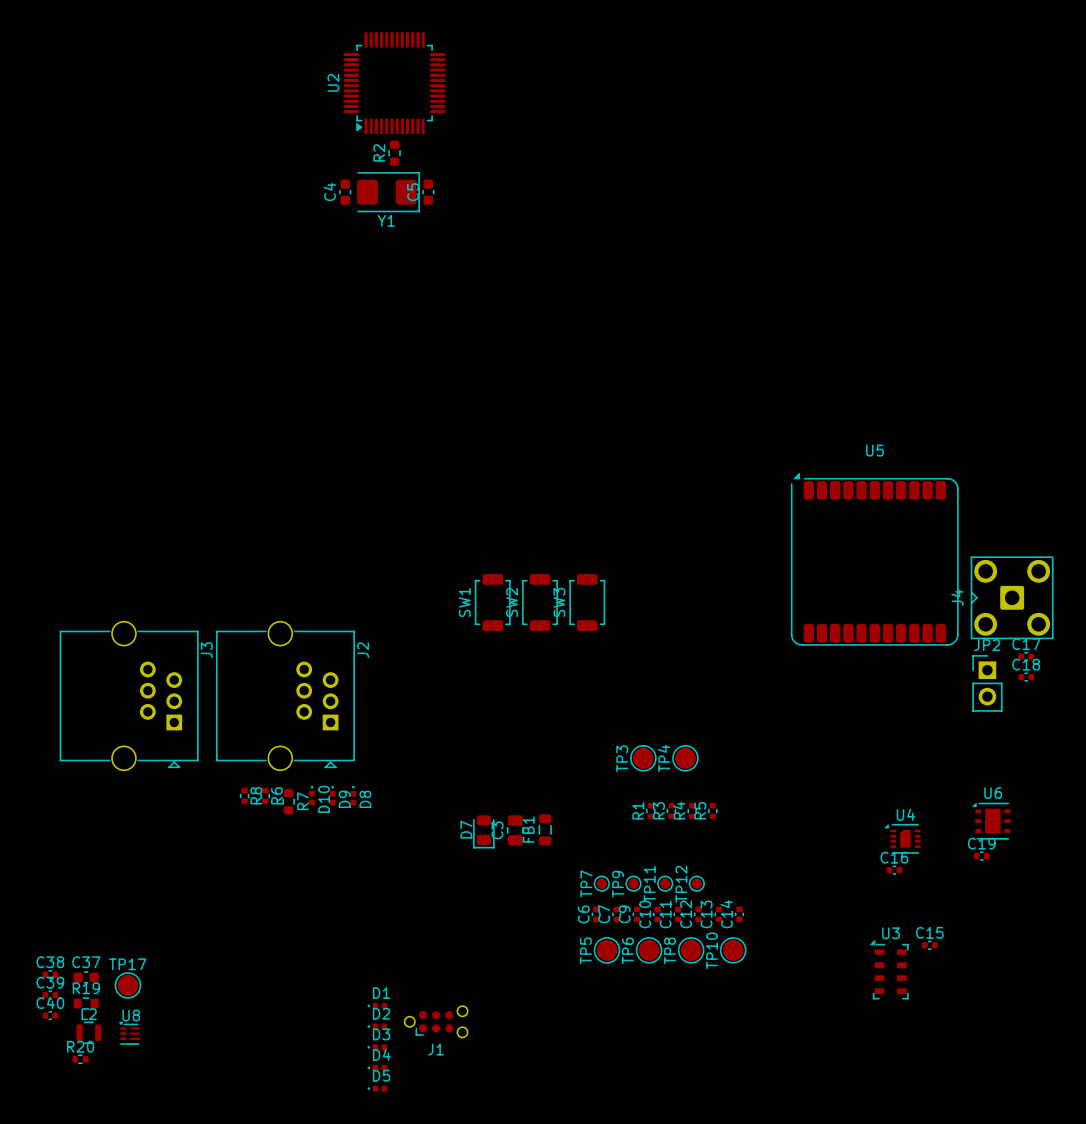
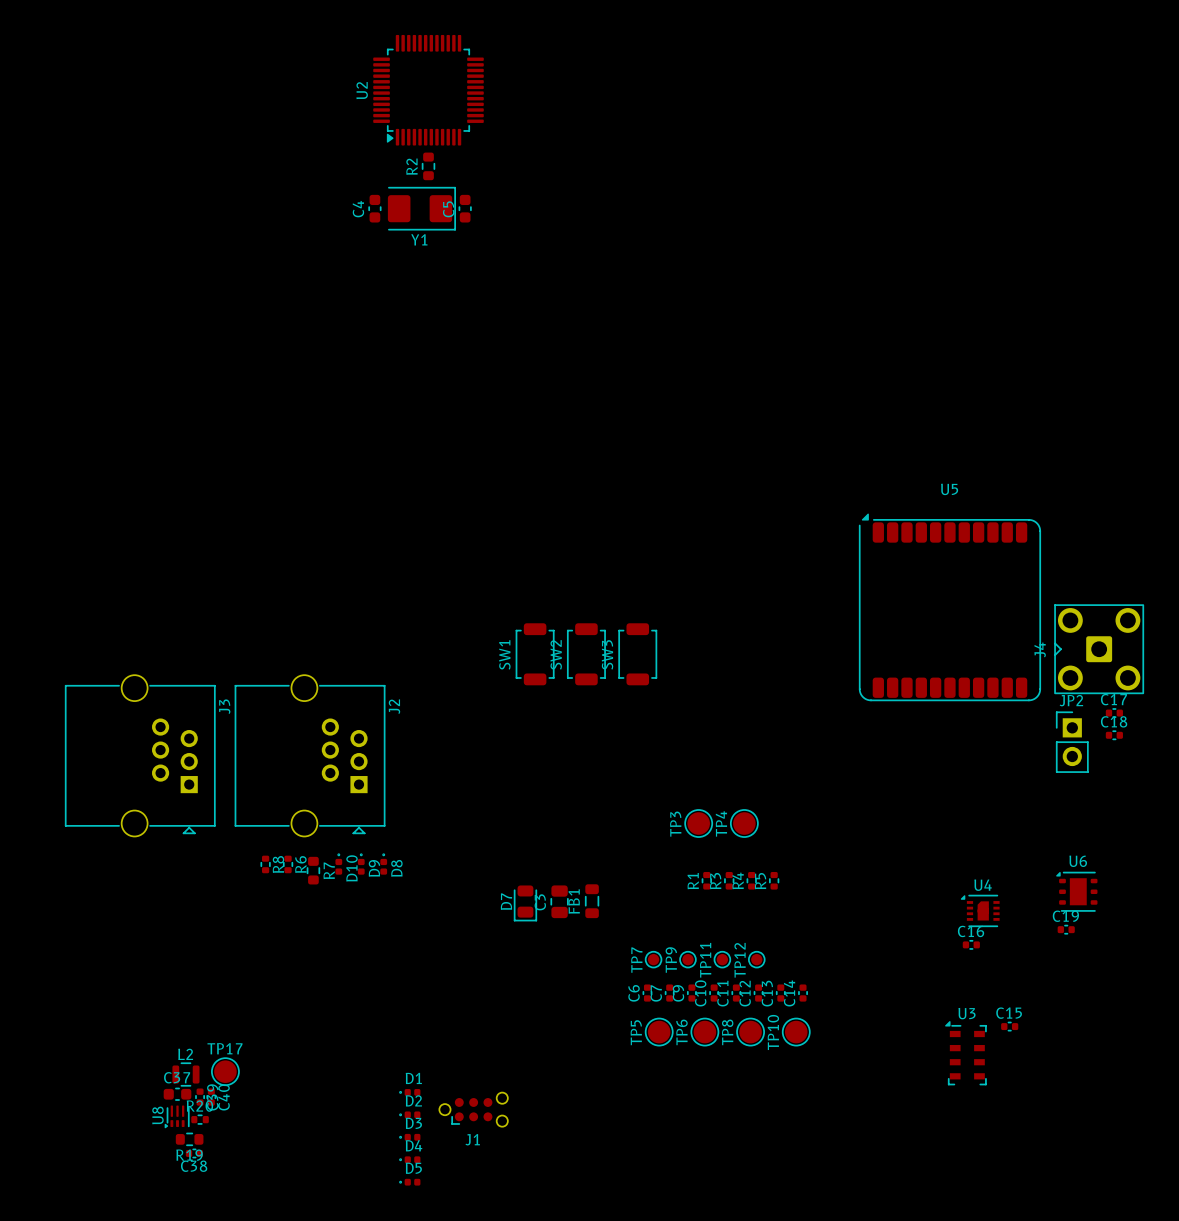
C38 name position: C38 (50, 962) -> C38 (194, 1166)
C38 position: (50, 974) -> (194, 1153)
C37 position: (86, 977) -> (177, 1094)
TP17 position: (127, 985) -> (225, 1071)
R19 name position: R19 (86, 988) -> R19 (189, 1155)
C39 rotation: 0° (50, 995) -> 90° clockwise (200, 1097)
C39 position: (50, 995) -> (200, 1097)
R19 position: (86, 1003) -> (189, 1139)
C40 rotation: 0° (50, 1015) -> 90° clockwise (211, 1097)
C40 position: (50, 1015) -> (211, 1097)
L2 position: (88, 1032) -> (185, 1074)
U8 rotation: 0° (129, 1033) -> 90° counterclockwise (177, 1116)
U8 position: (129, 1033) -> (177, 1116)
R20 position: (80, 1059) -> (200, 1119)

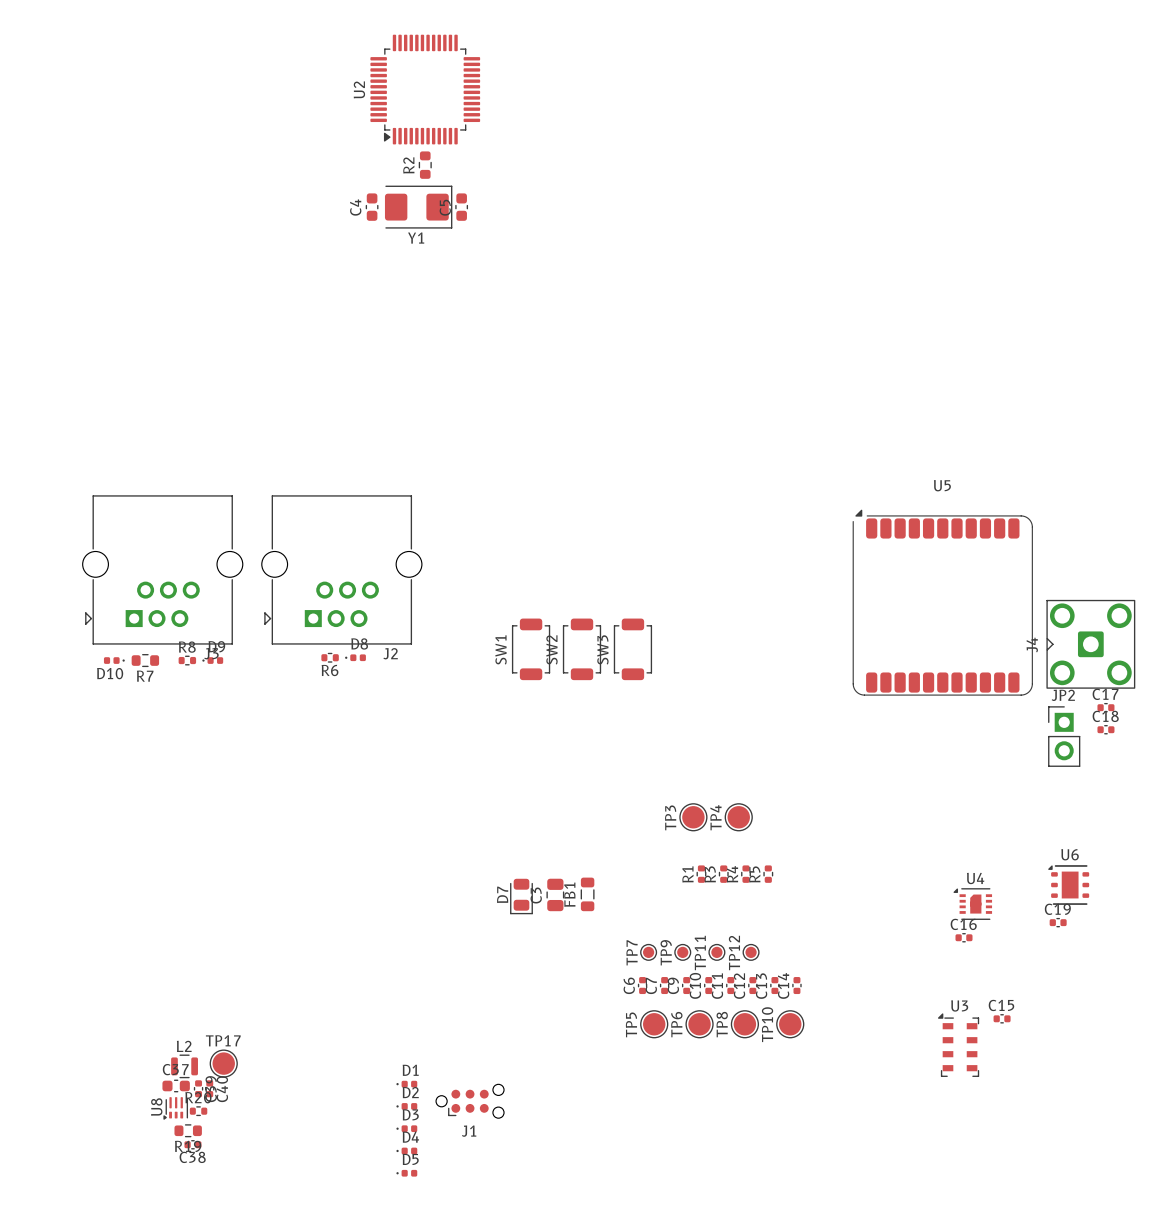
J3 rotation: 0° (140, 755) -> 90° clockwise (162, 569)
J3 position: (140, 755) -> (162, 569)
J2 rotation: 0° (310, 755) -> 90° clockwise (341, 569)
J2 position: (310, 755) -> (341, 569)
R8 rotation: 0° (265, 864) -> 90° clockwise (187, 660)
R8 position: (265, 864) -> (187, 660)
R6 rotation: 0° (288, 864) -> 90° clockwise (330, 657)
R6 position: (288, 864) -> (330, 657)
D10 rotation: 0° (338, 864) -> 90° clockwise (114, 660)
D10 position: (338, 864) -> (114, 660)
D9 rotation: 0° (361, 864) -> 90° counterclockwise (212, 660)
D9 position: (361, 864) -> (212, 660)
D8 rotation: 0° (383, 864) -> 90° counterclockwise (355, 657)
D8 position: (383, 864) -> (355, 657)
R7 rotation: 0° (313, 870) -> 90° clockwise (145, 660)
R7 position: (313, 870) -> (145, 660)

